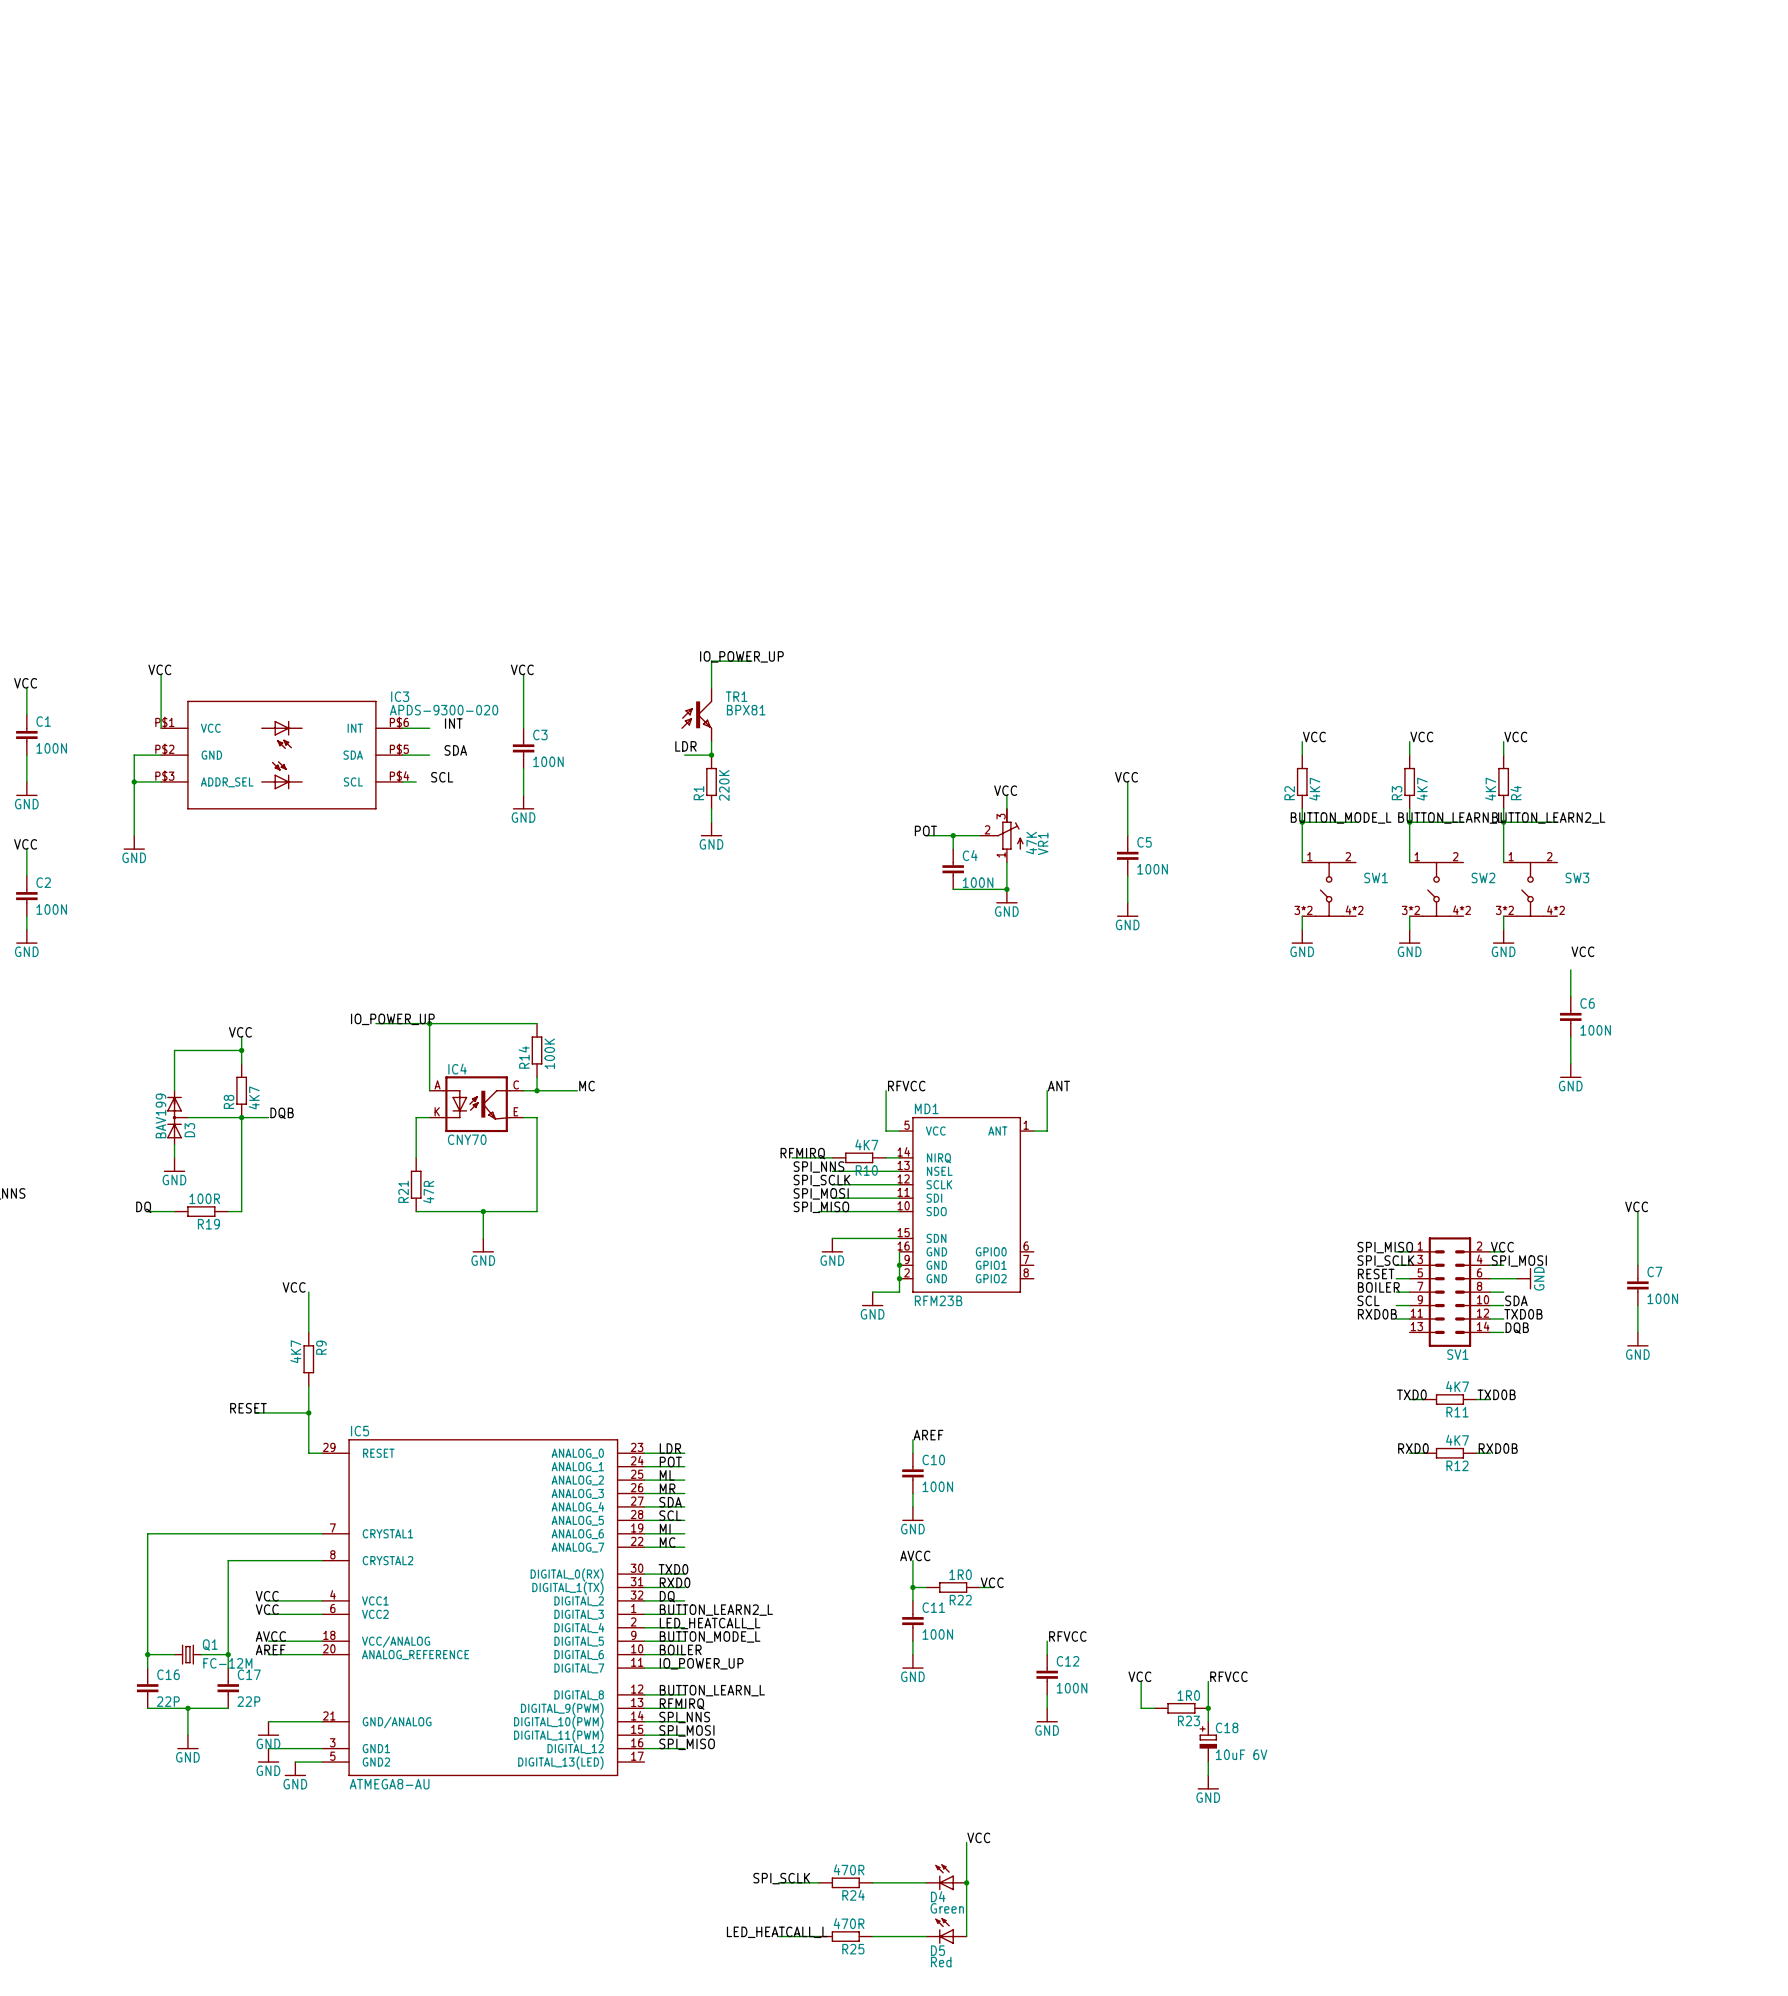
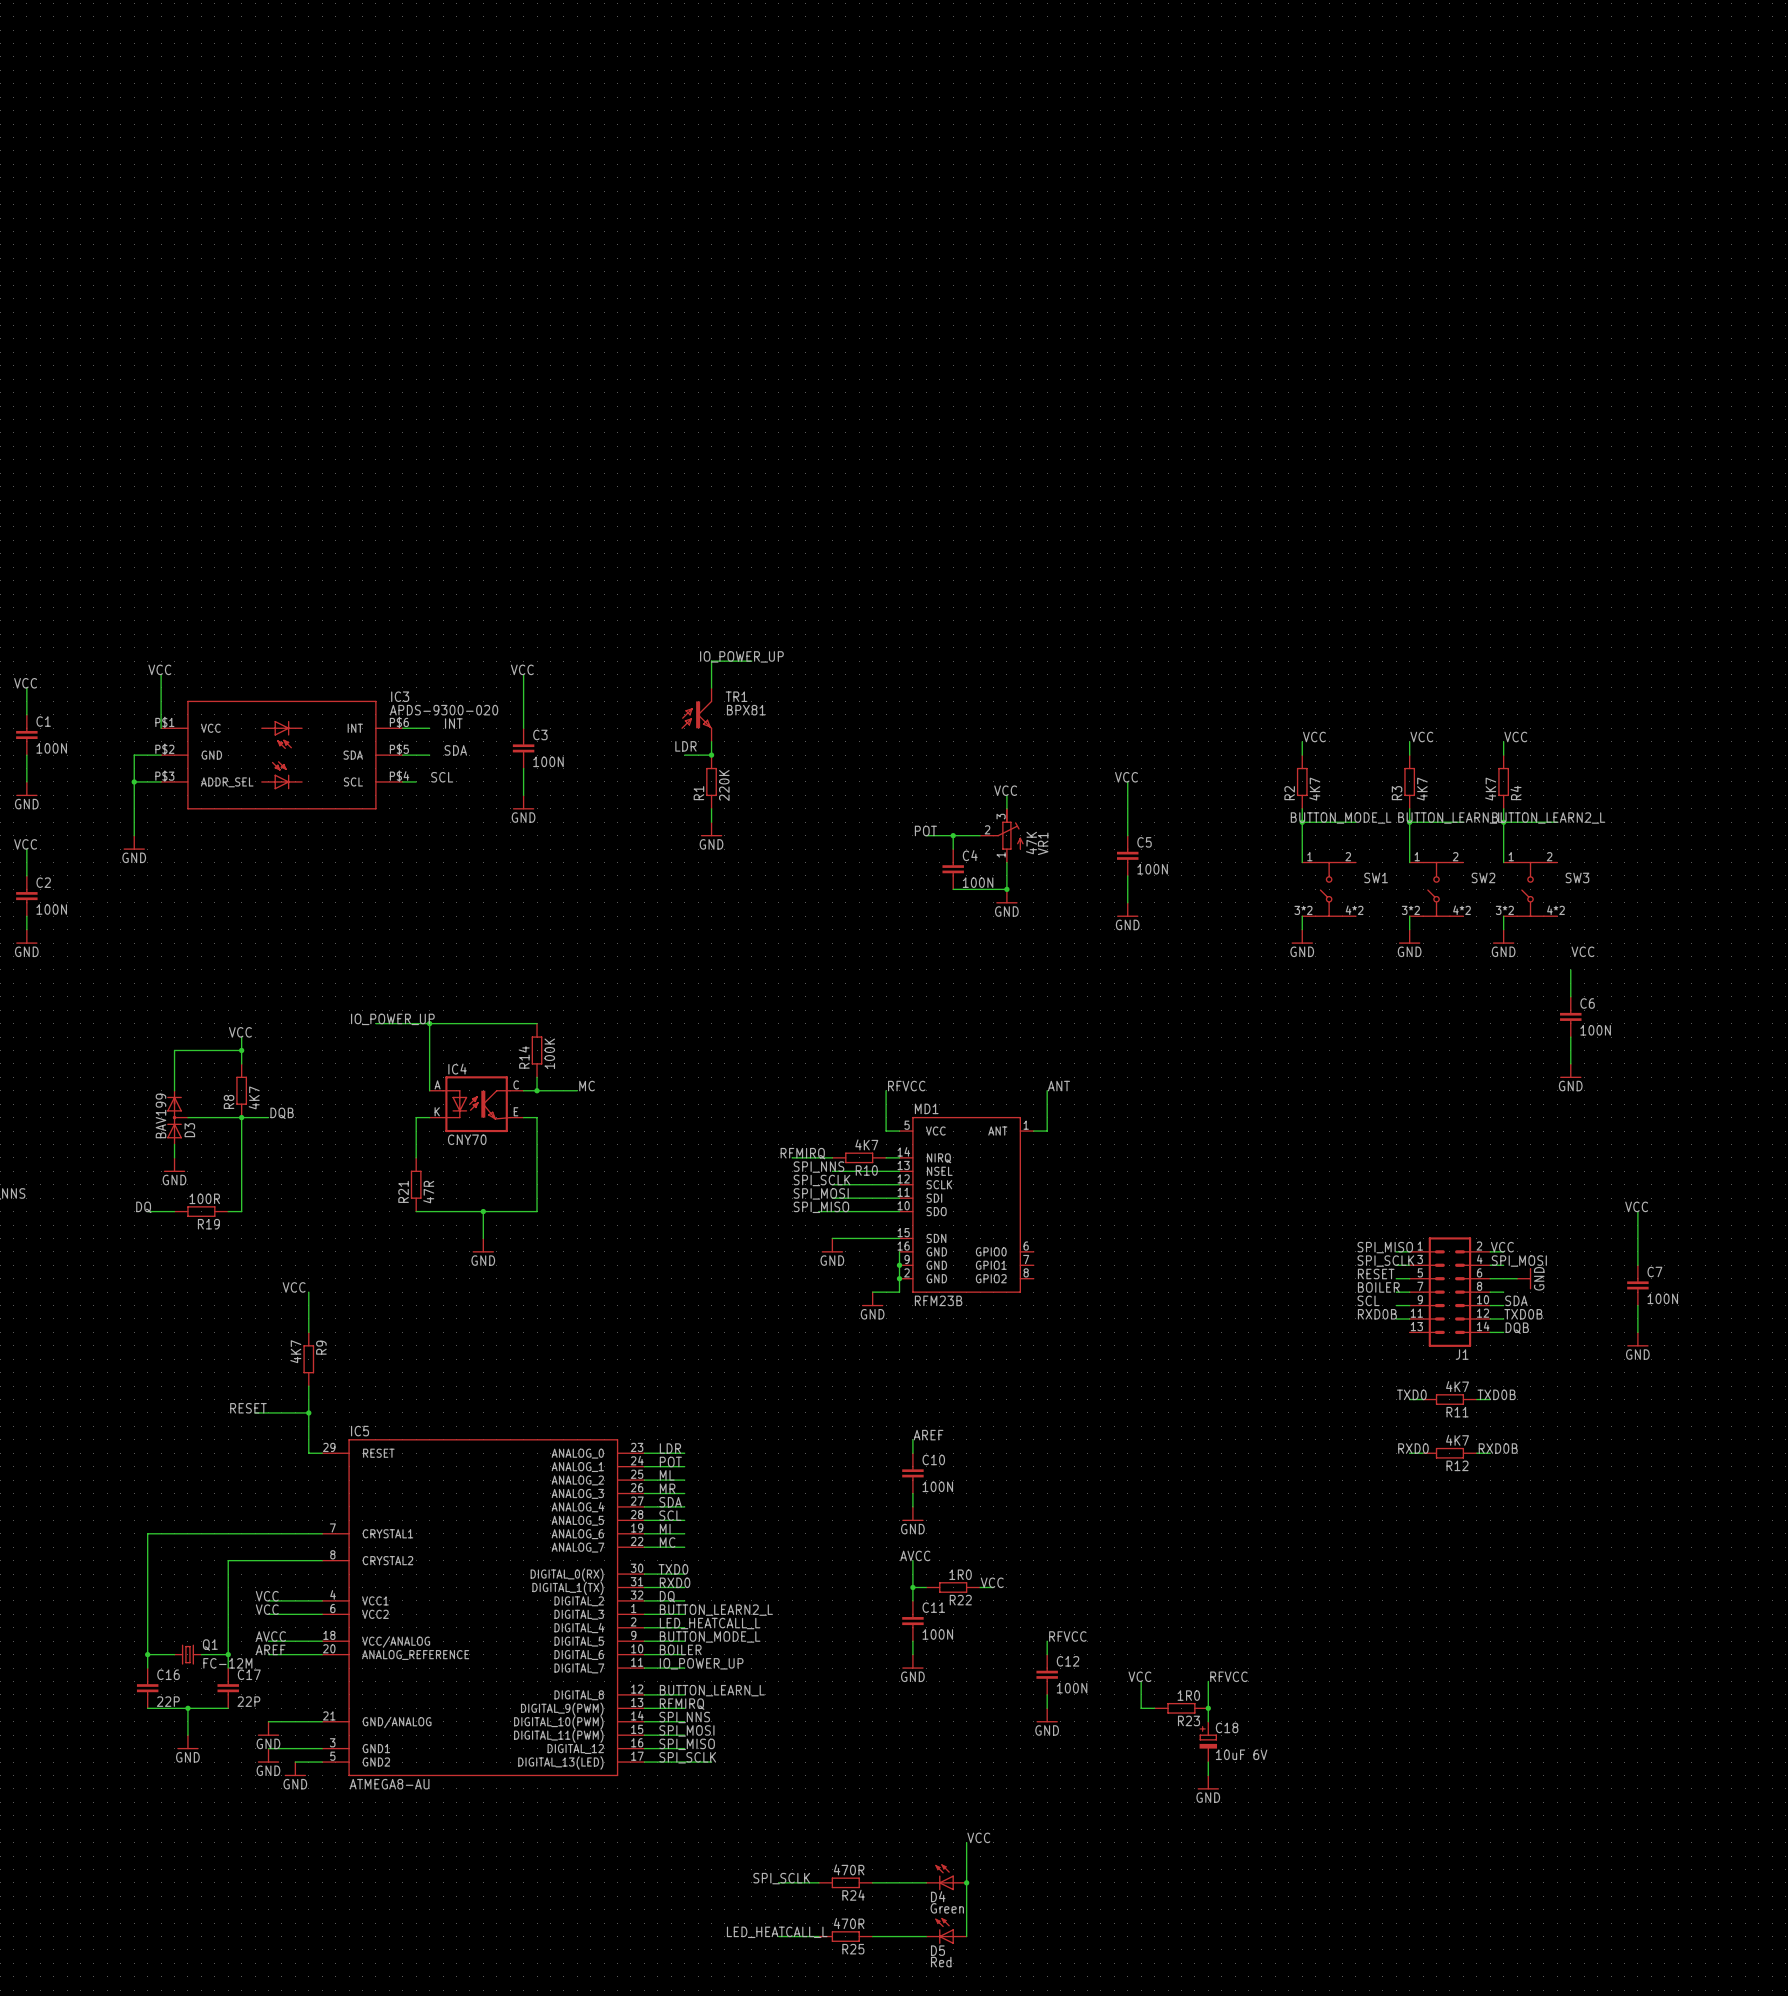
SV1 name: SV1 (1457, 1354) -> J1 (1462, 1354)
label: none -> SPI_SCLK (687, 1757)
wire: none -> (644, 1762) (711, 1762)

